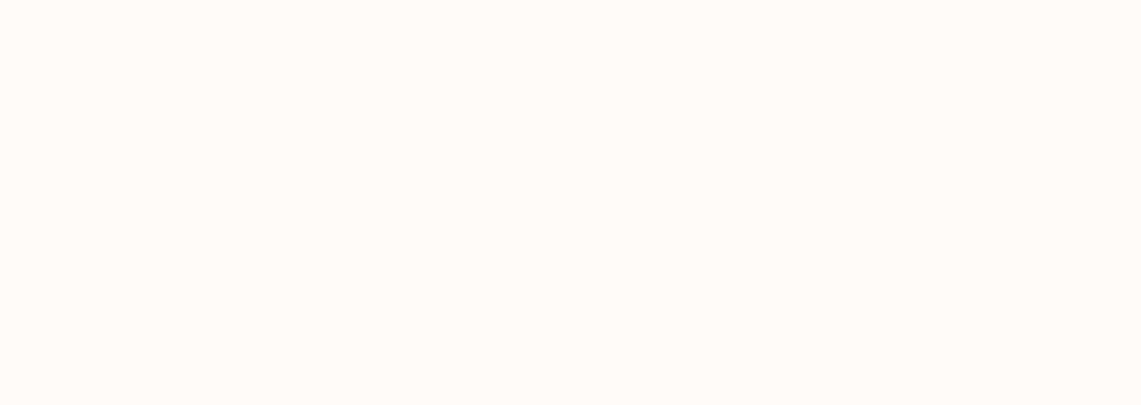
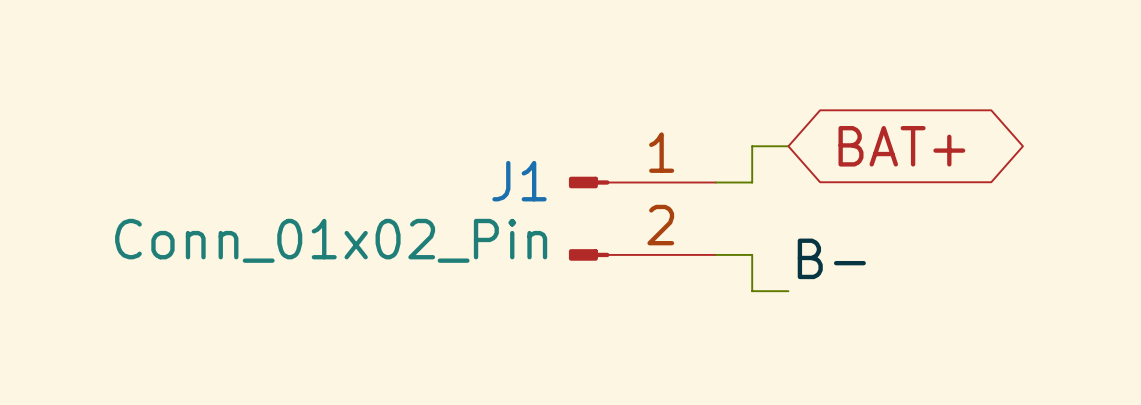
wire: none -> (788, 146) (752, 146) (752, 182) (715, 182)
global label: none -> BAT+ (901, 146)
J1: none -> Conn_01x02_Pin (642, 218)
wire: none -> (715, 254) (752, 254) (752, 291) (788, 291)
label: none -> B- (831, 258)

